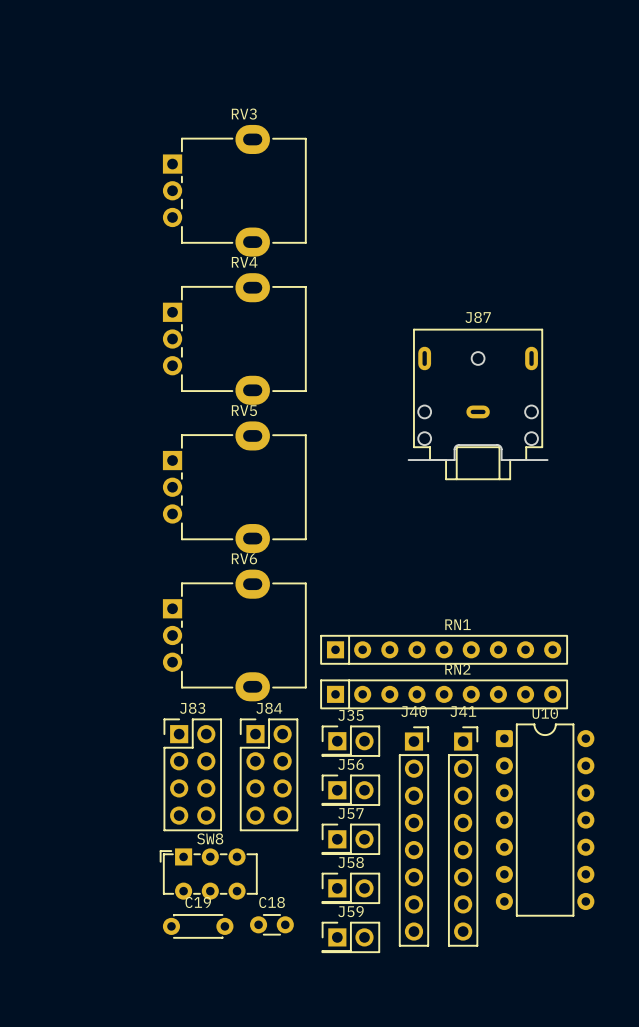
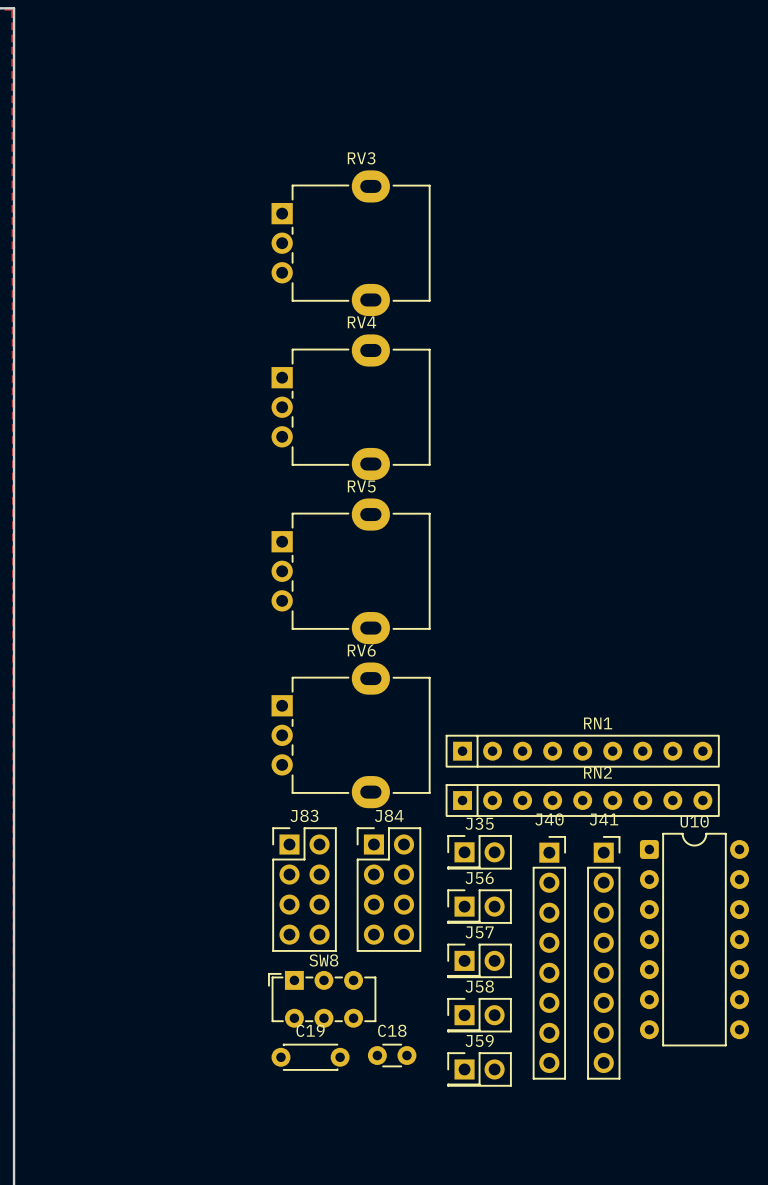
J87: (478, 404) -> none

